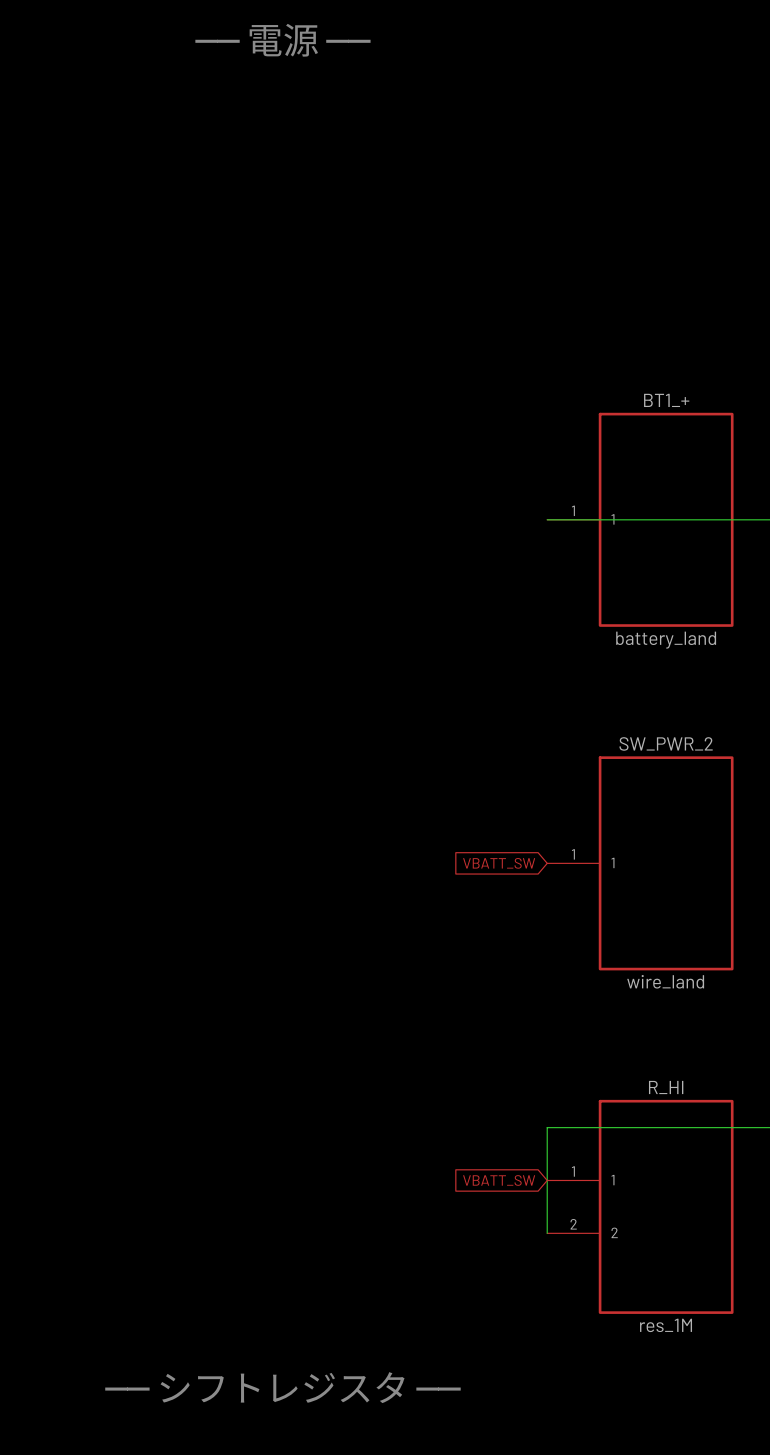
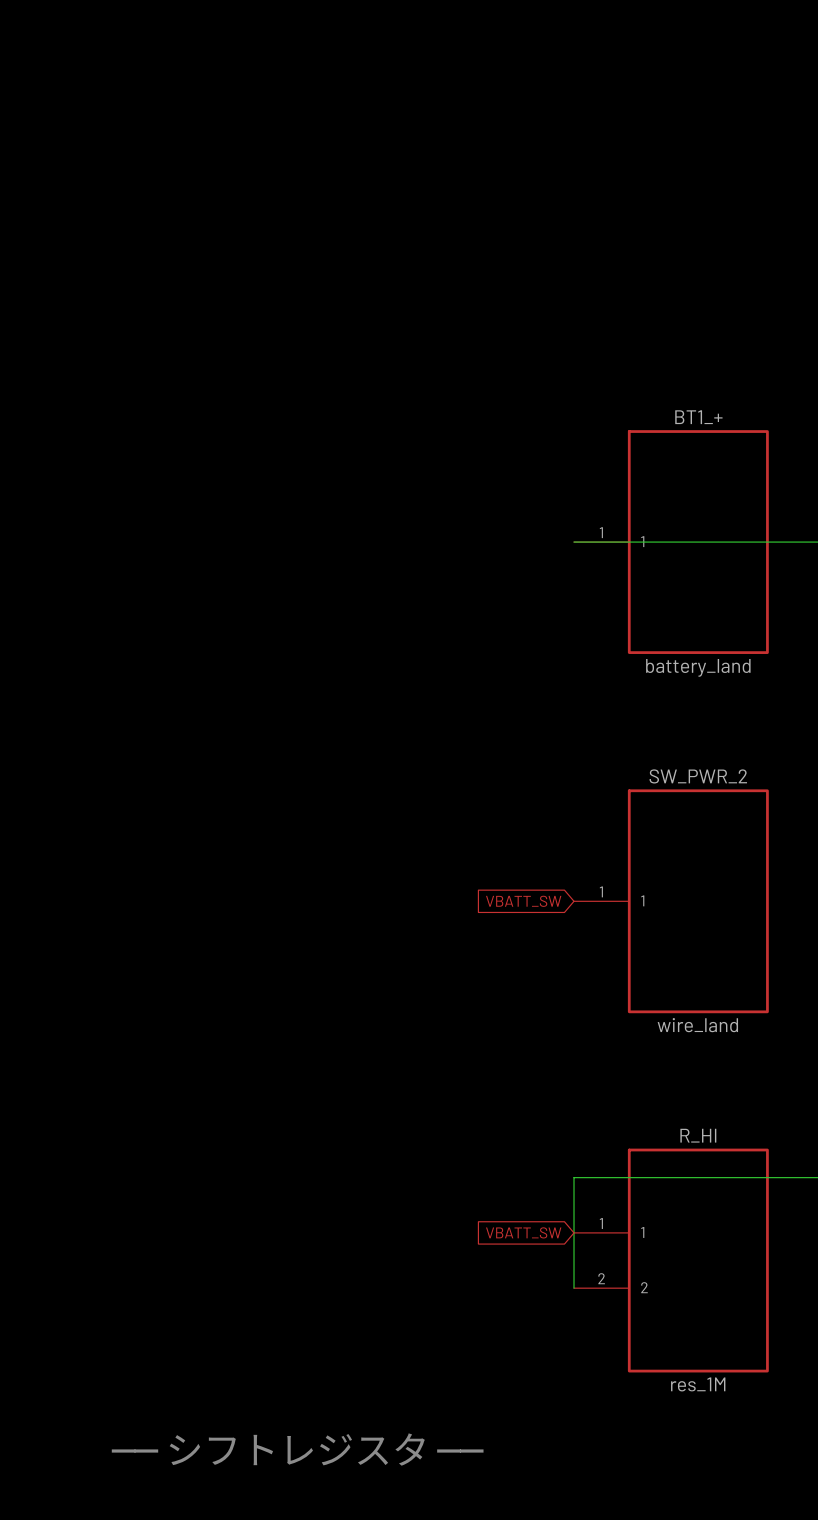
text: ── 電源 ── (282, 40) -> none

